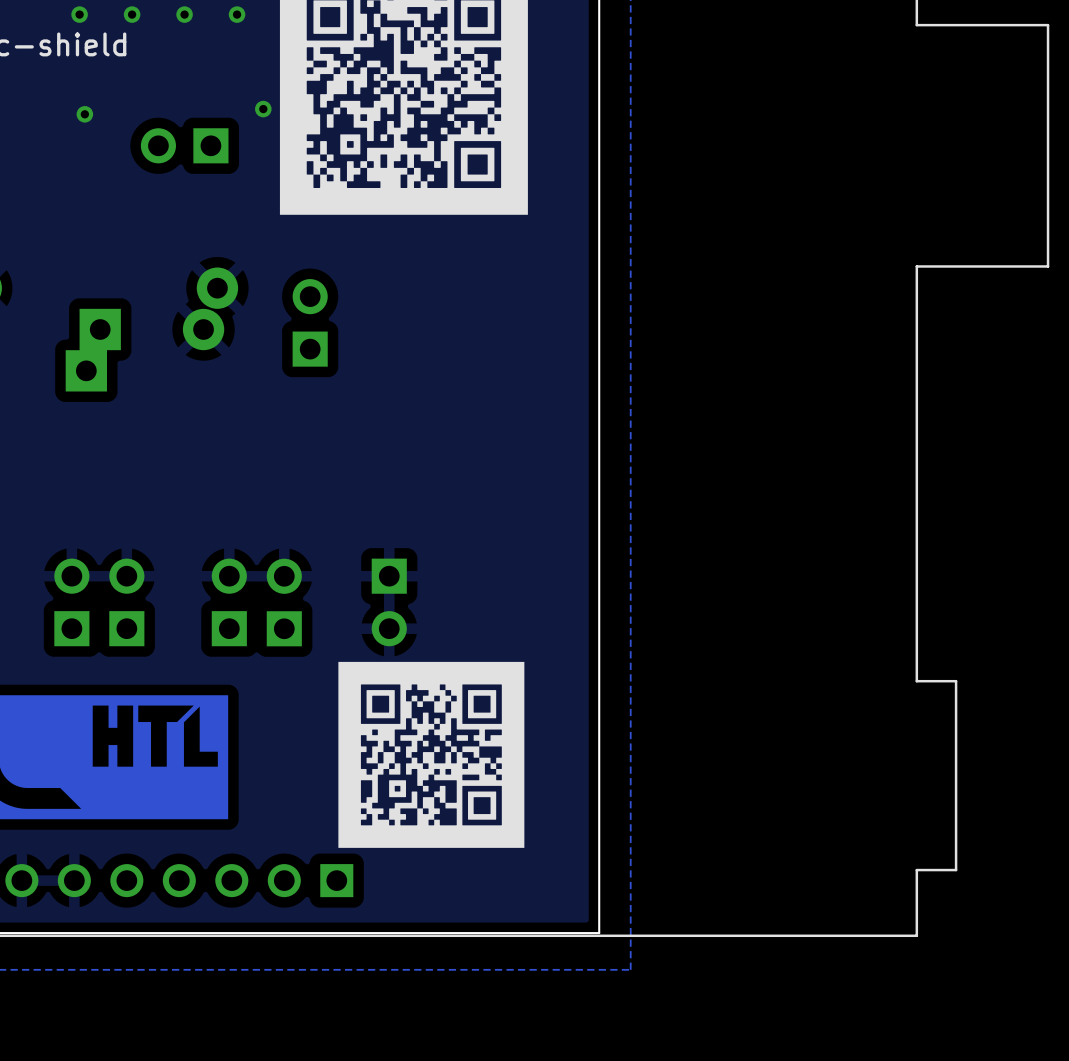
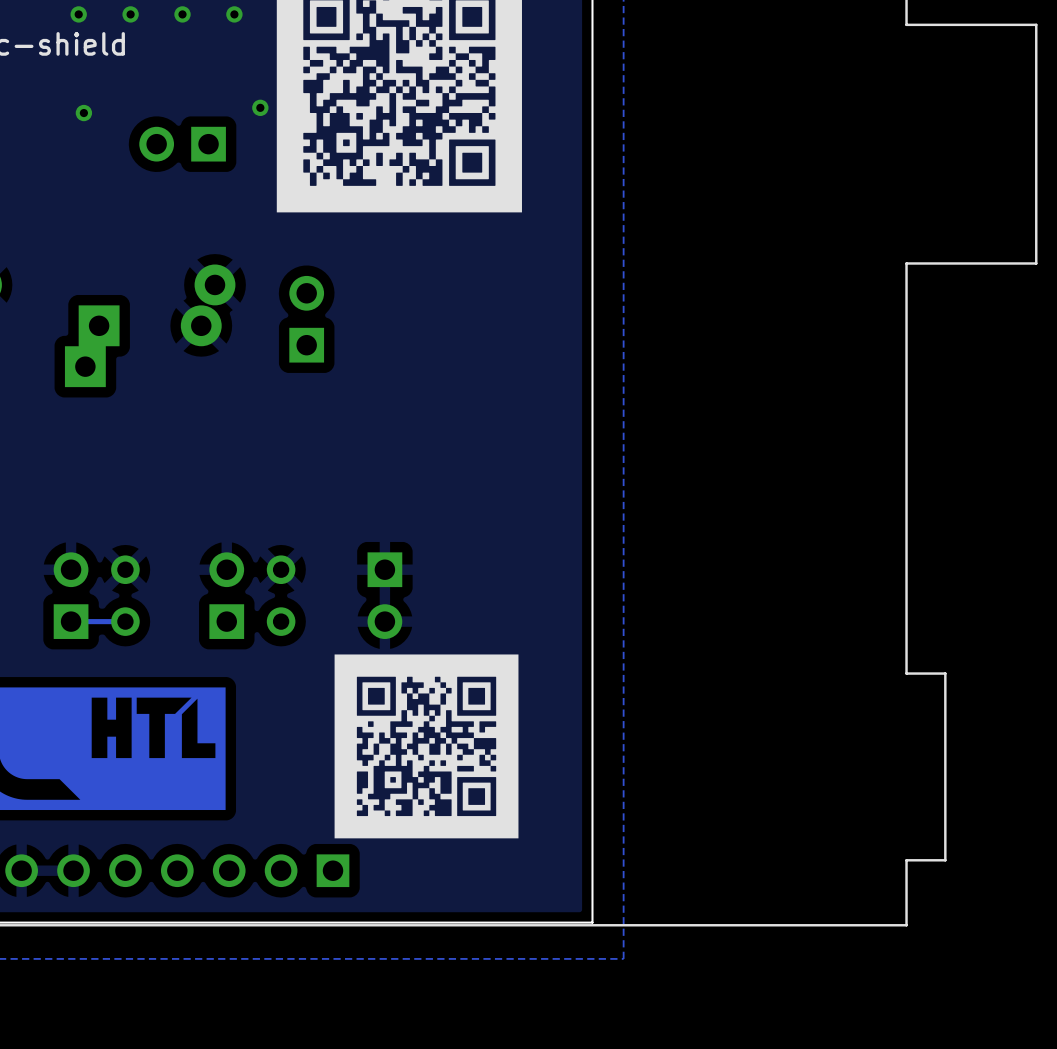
part footprint: [109, 558, 145, 647] -> [111, 555, 140, 636]
part footprint: [266, 558, 302, 647] -> [266, 555, 296, 636]
track: none -> (125, 621) (71, 621)

